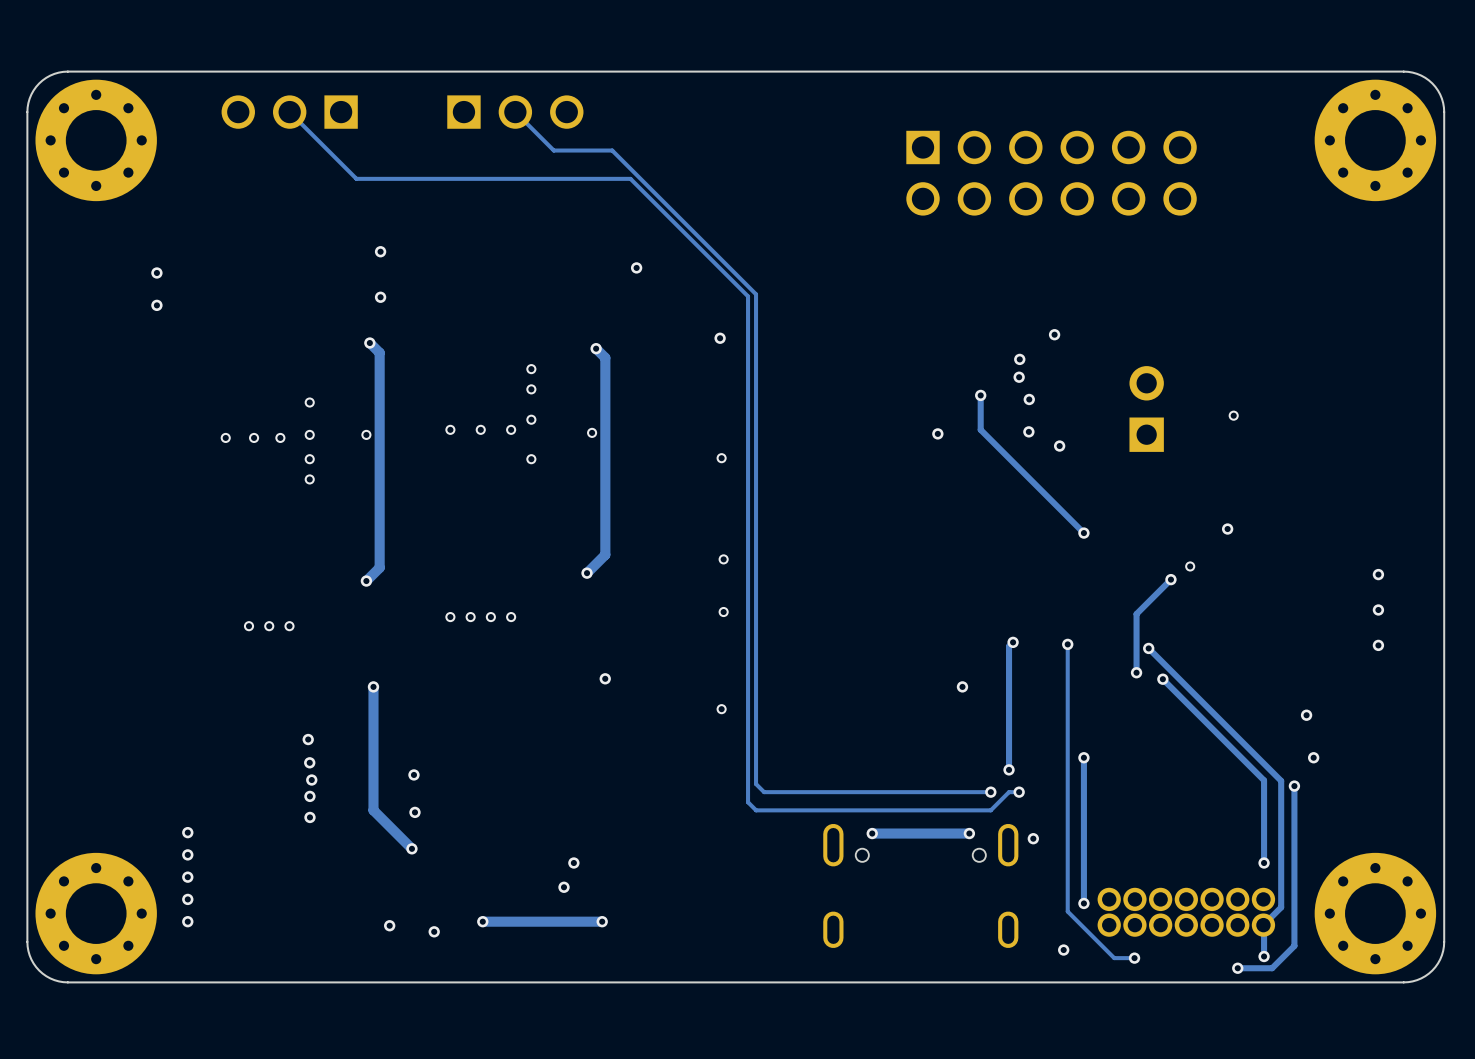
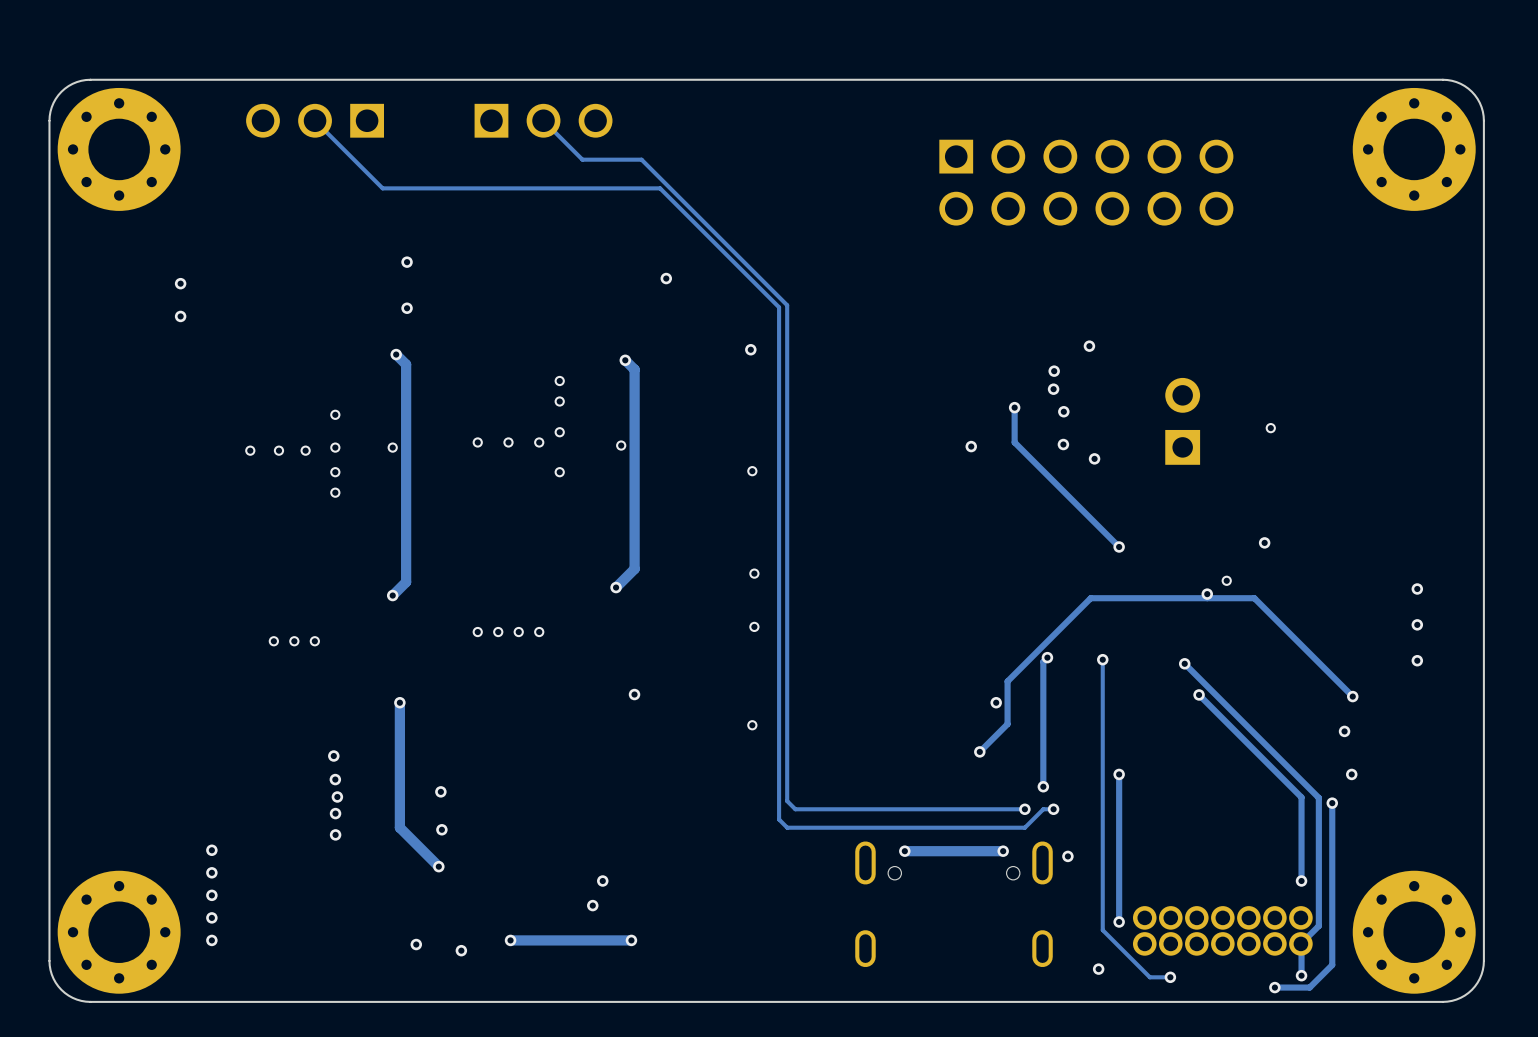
track: (1170, 579) (1136, 614) (1136, 672) -> none
via: (1136, 672) -> none
track: none -> (1352, 696) (1254, 598) (1090, 598) (1007, 681) (1007, 724) (979, 751)
via: none -> (1352, 696)
via: none -> (979, 751)

